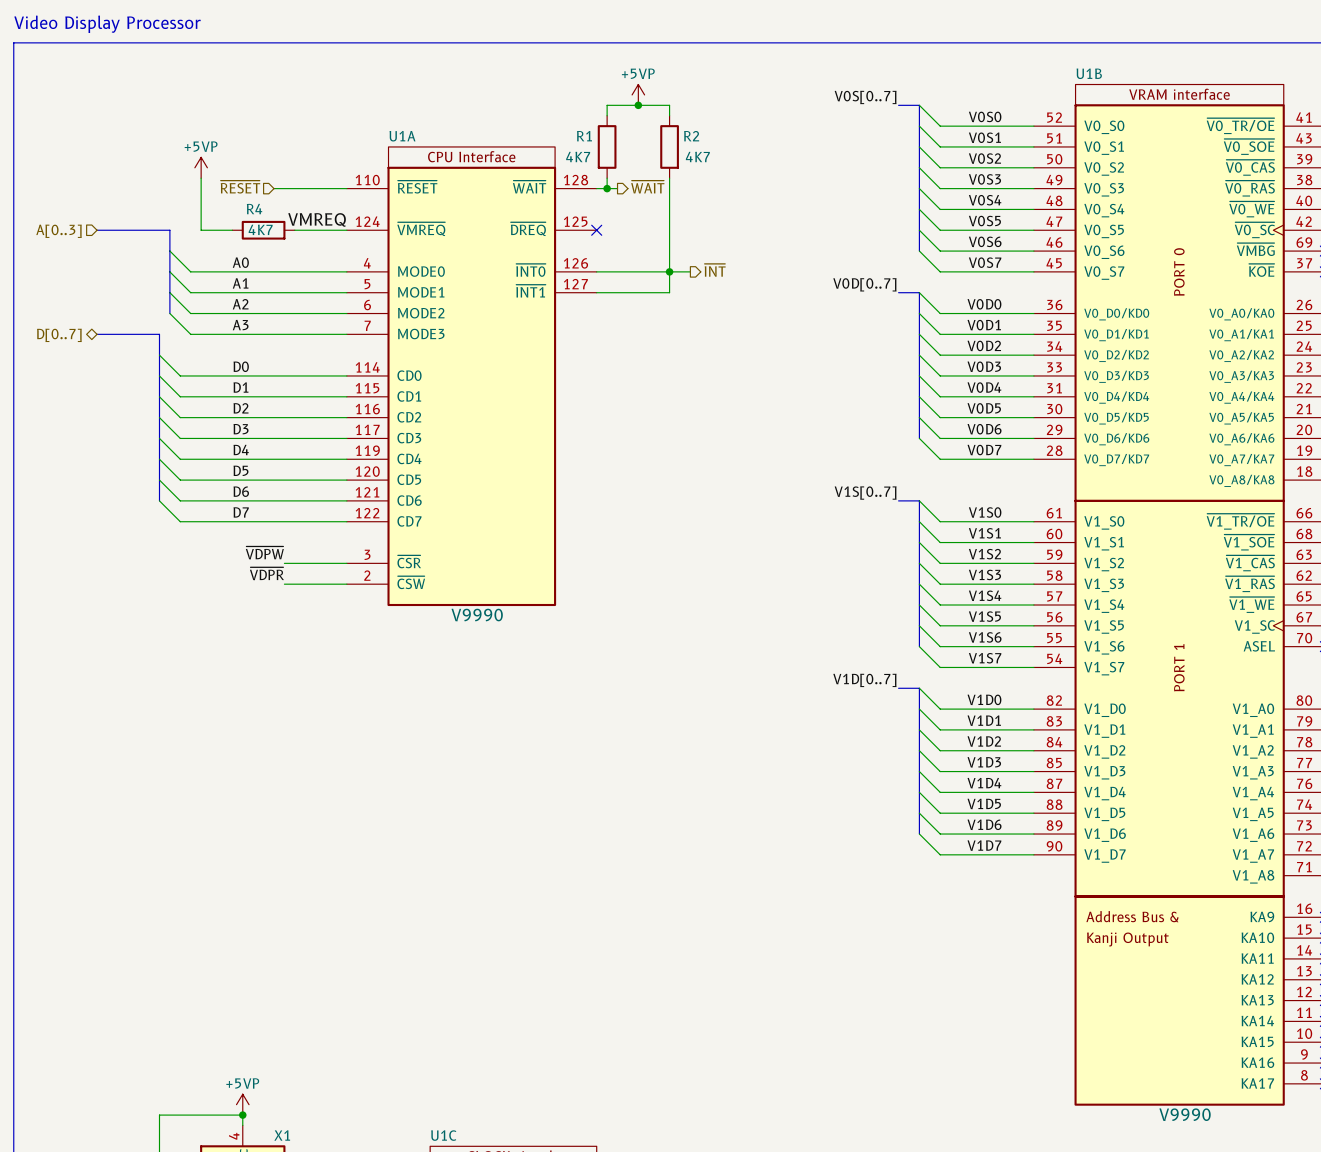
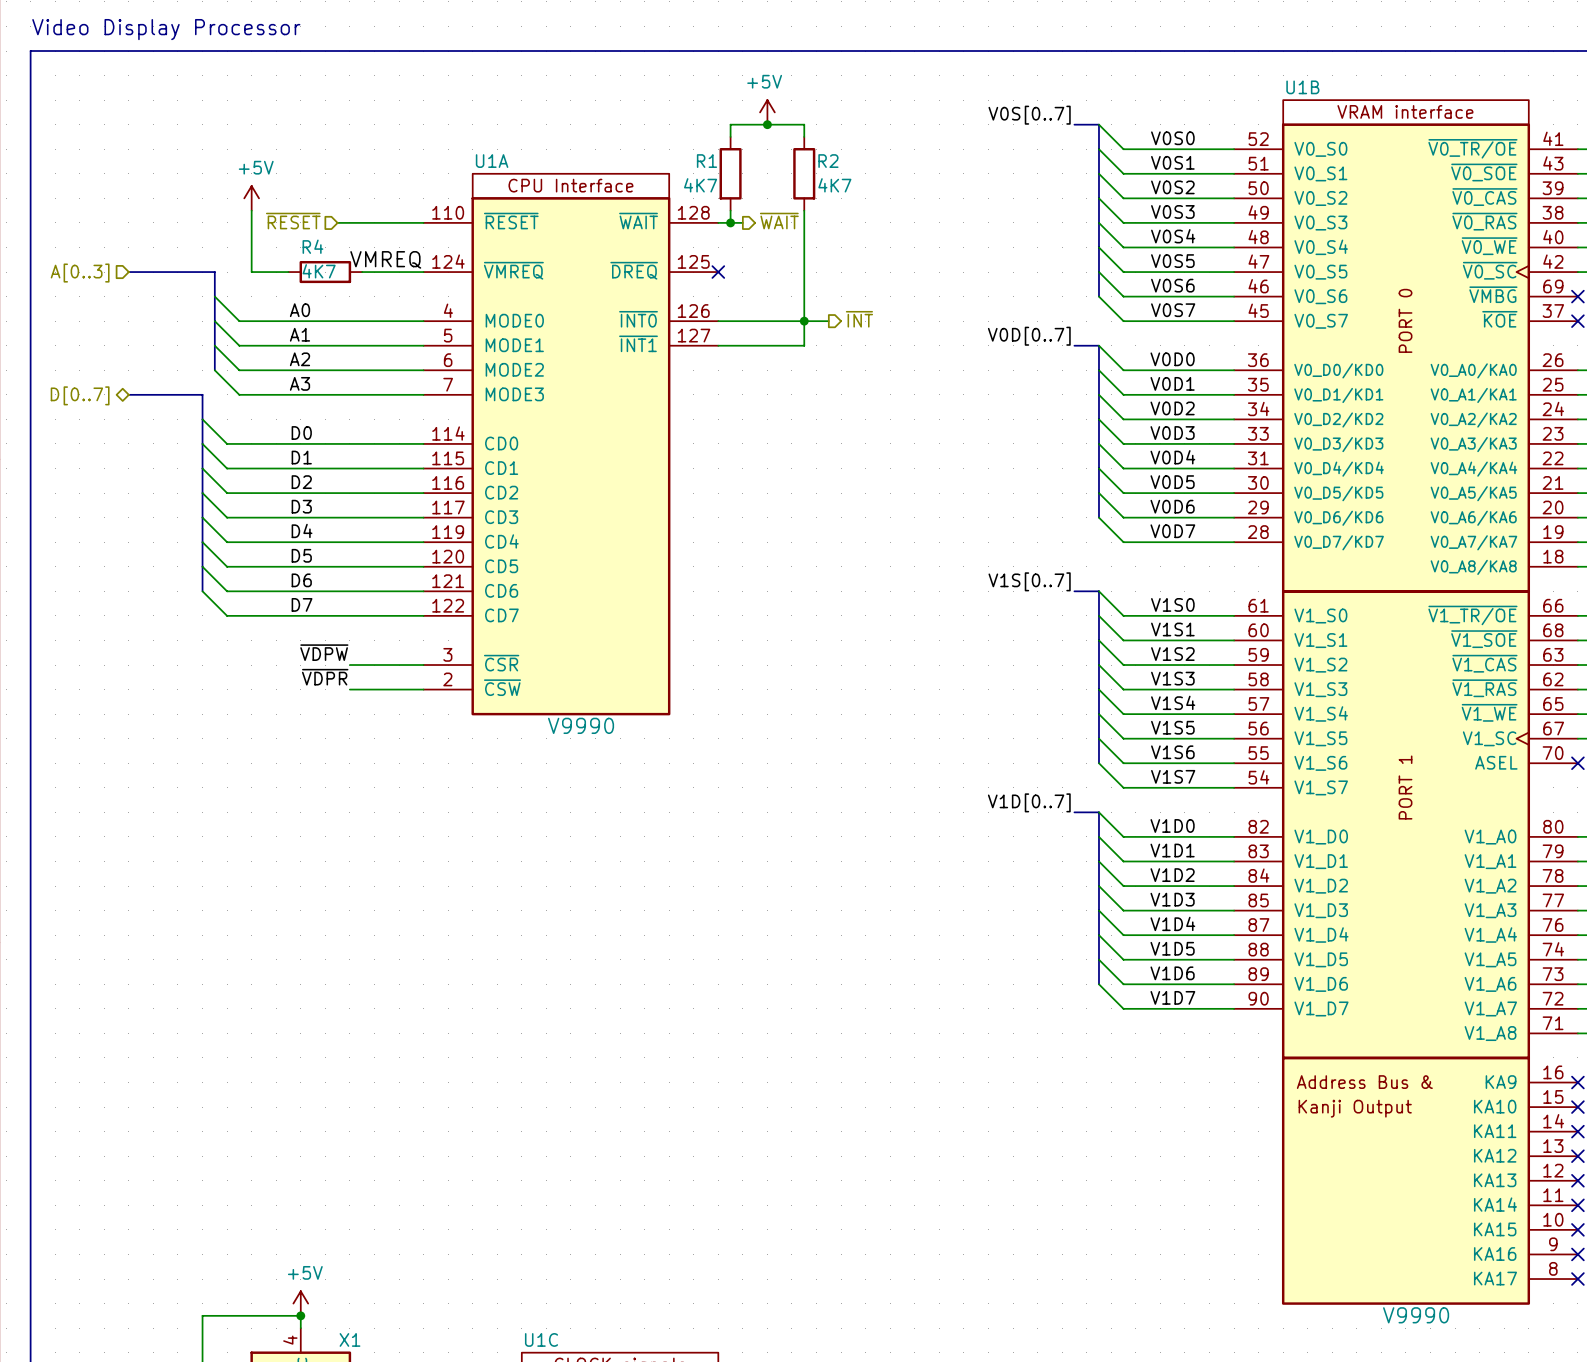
power symbol: +5VP (638, 94) -> +5V (767, 112)
power symbol: +5VP (201, 167) -> +5V (251, 198)
power symbol: +5VP (242, 1104) -> +5V (300, 1303)

